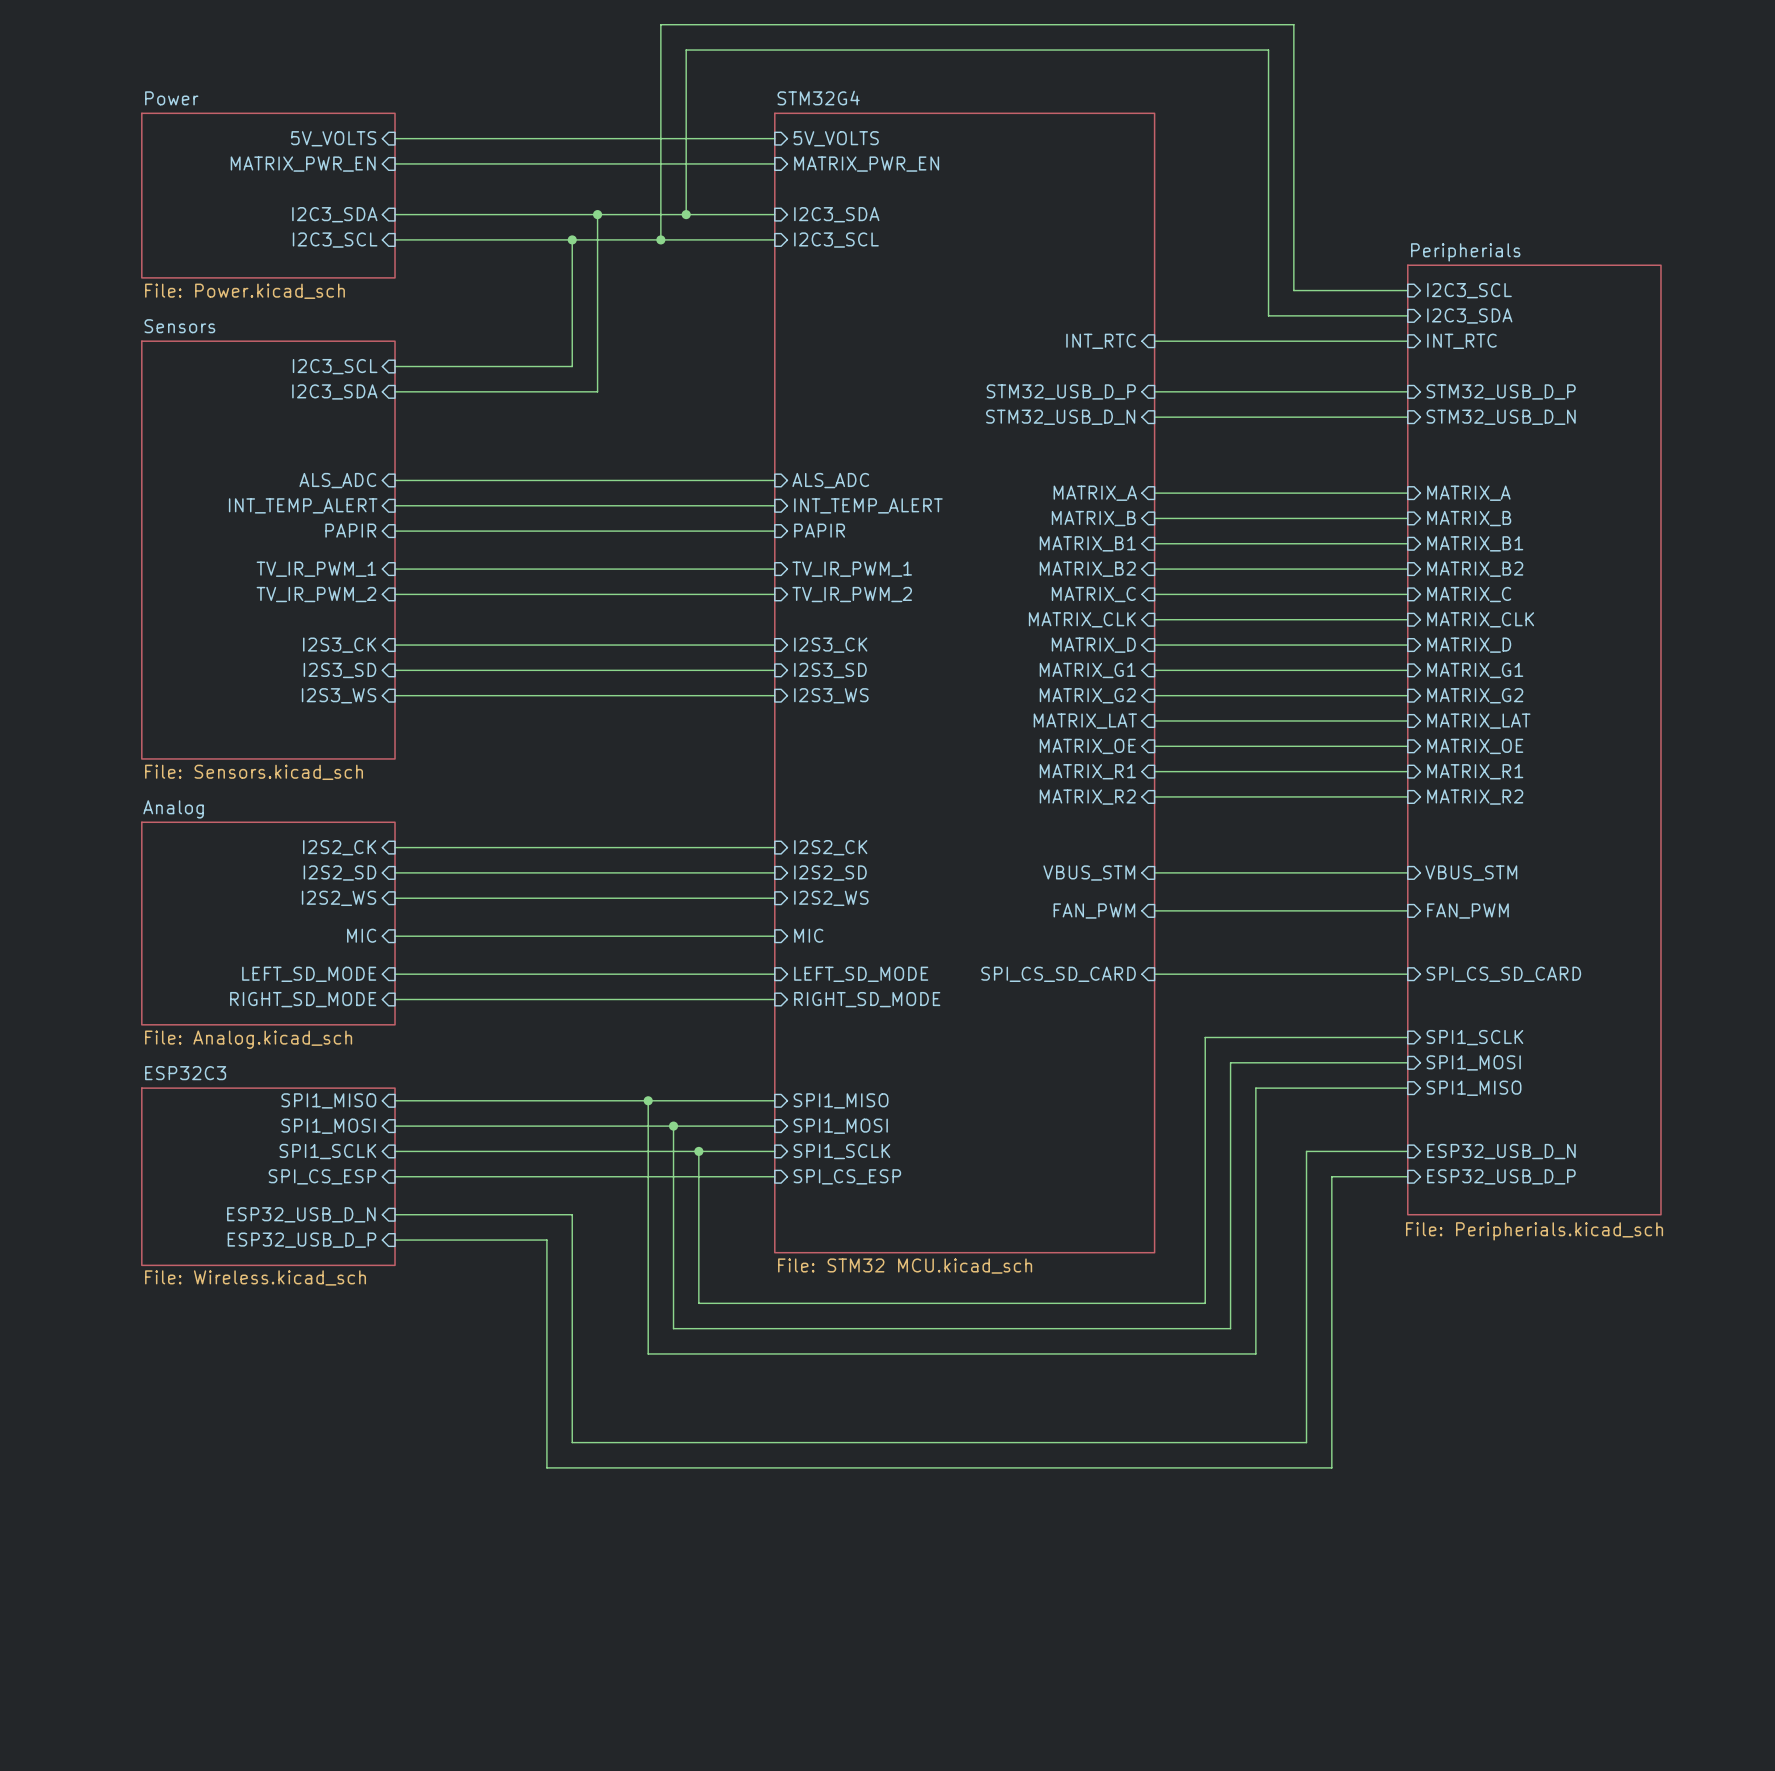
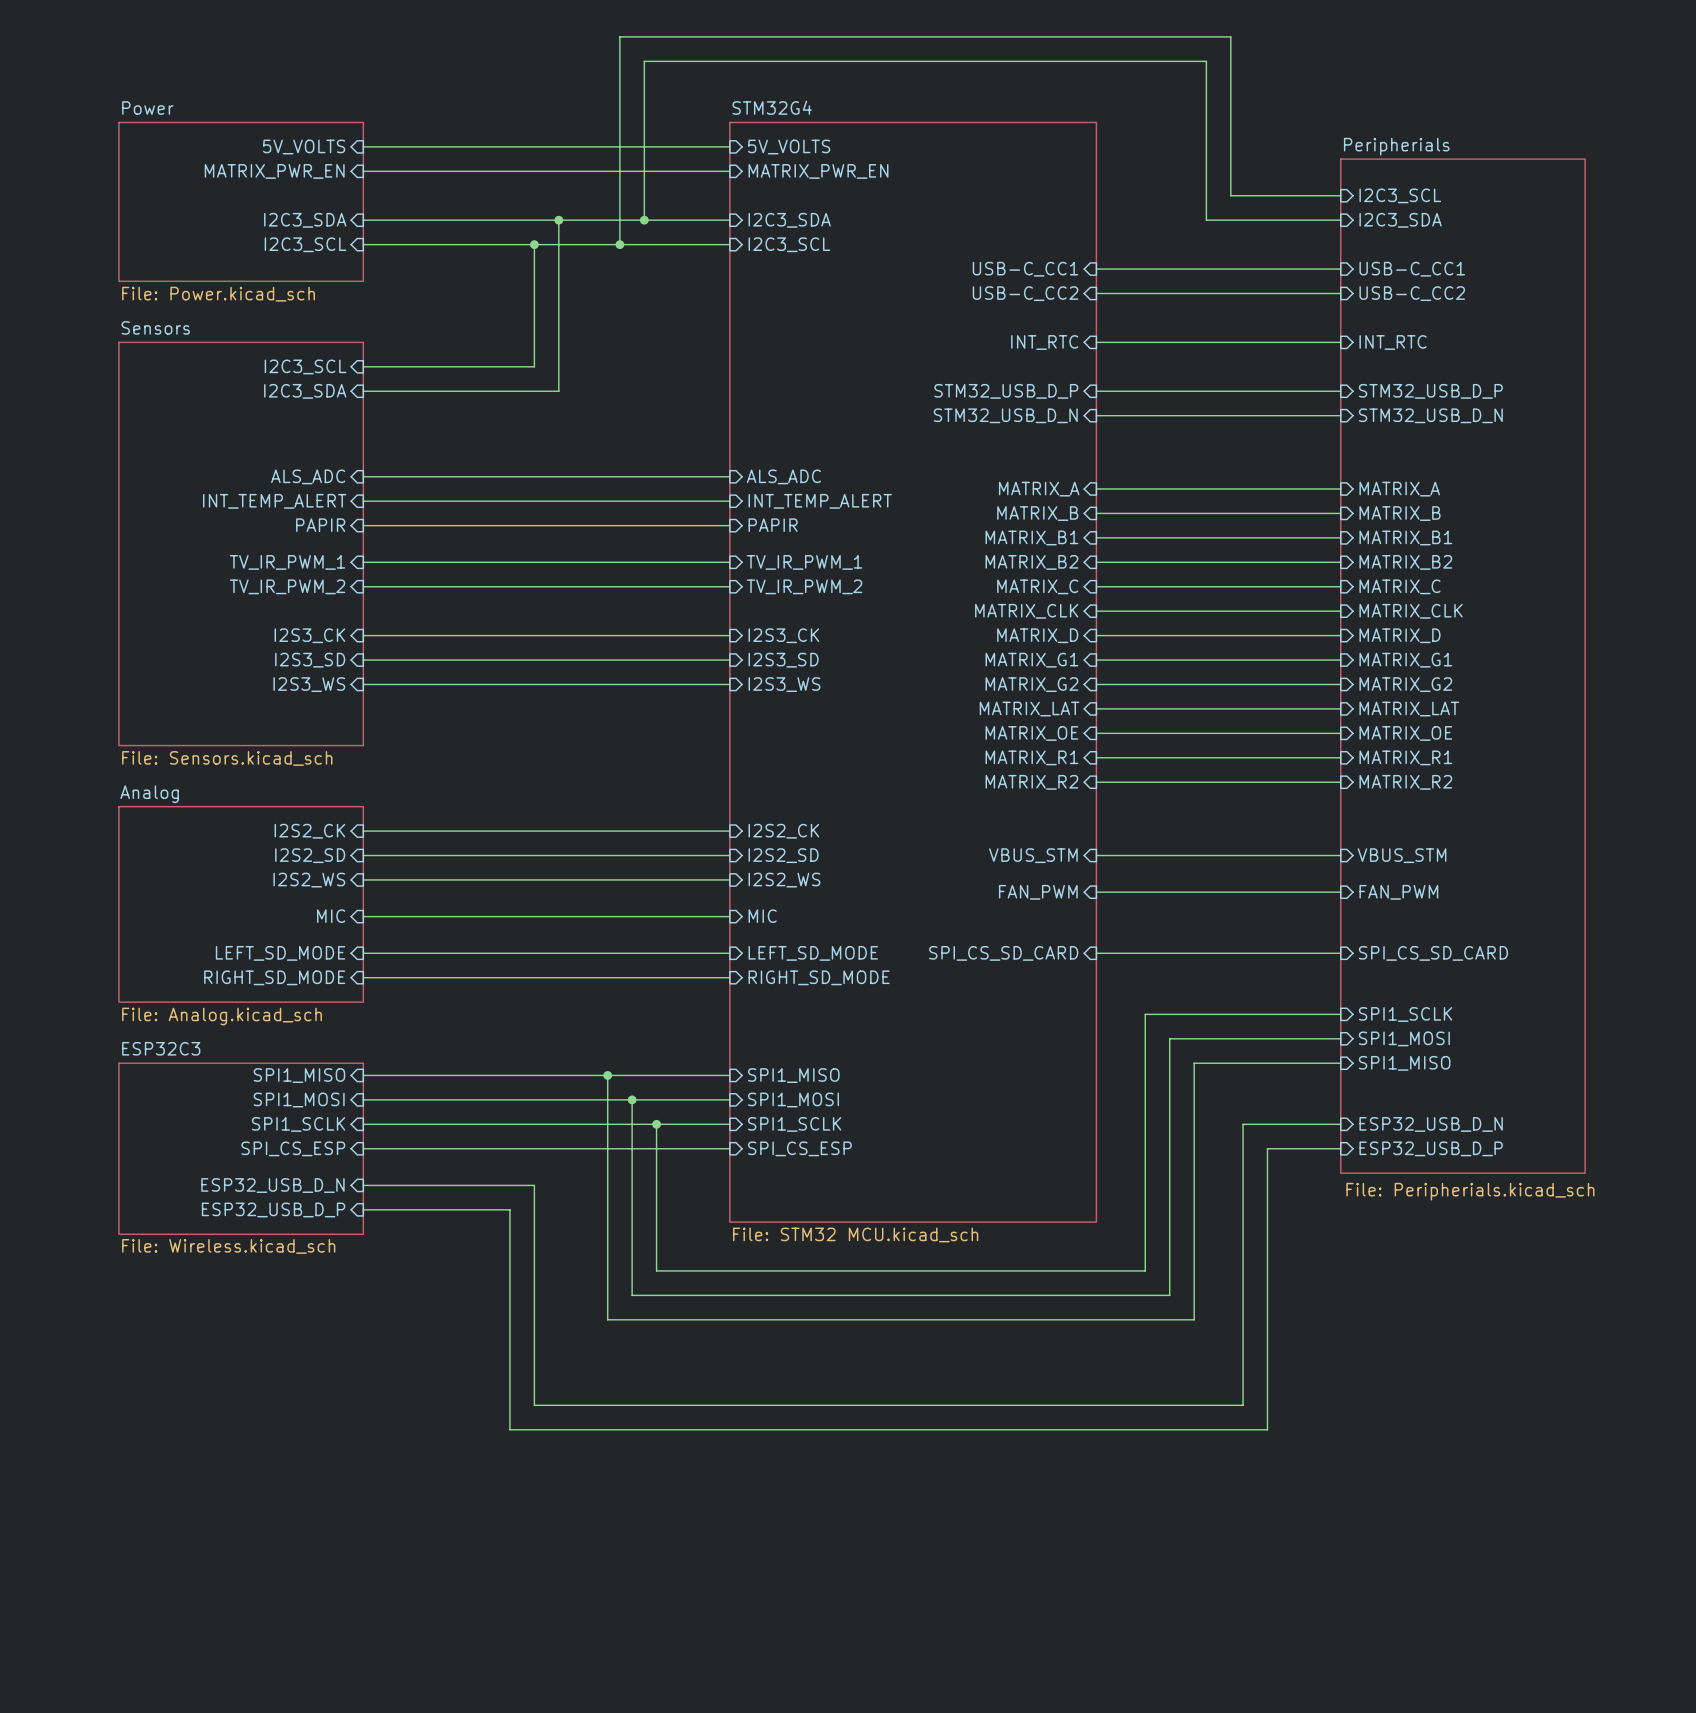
wire: (1293, 189) (1293, 290) -> (1230, 195) (1340, 195)
sheet pin: none -> I2C3_SCL (1400, 195)
wire: (1268, 214) (1268, 315) (1407, 315) -> (1206, 220) (1340, 220)
sheet pin: none -> USB-C_CC1 (1025, 269)
wire: none -> (1096, 269) (1340, 269)
sheet pin: none -> USB-C_CC1 (1412, 269)
sheet pin: none -> USB-C_CC2 (1025, 293)
wire: none -> (1096, 293) (1230, 293)
sheet pin: I2C3_SCL (1469, 290) -> USB-C_CC2 (1412, 293)
sheet pin position: I2C3_SDA (1469, 316) -> I2C3_SDA (1400, 220)
sheet Peripherials: none -> File: Peripherials.kicad_sch (1462, 666)
sheet Peripherials: File: Peripherials.kicad_sch (1534, 739) -> none

